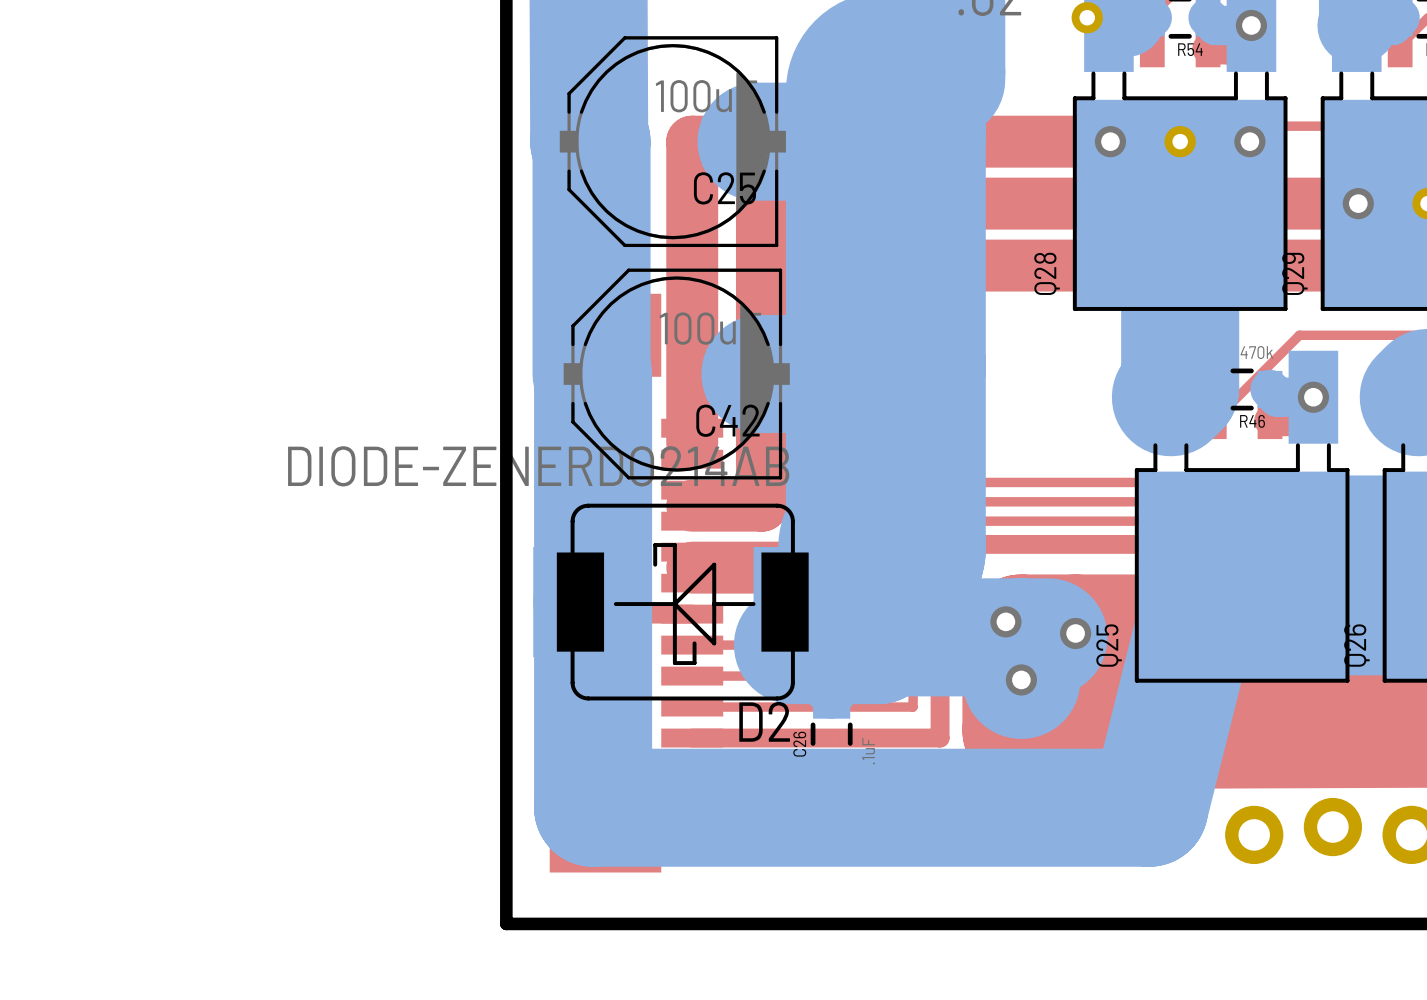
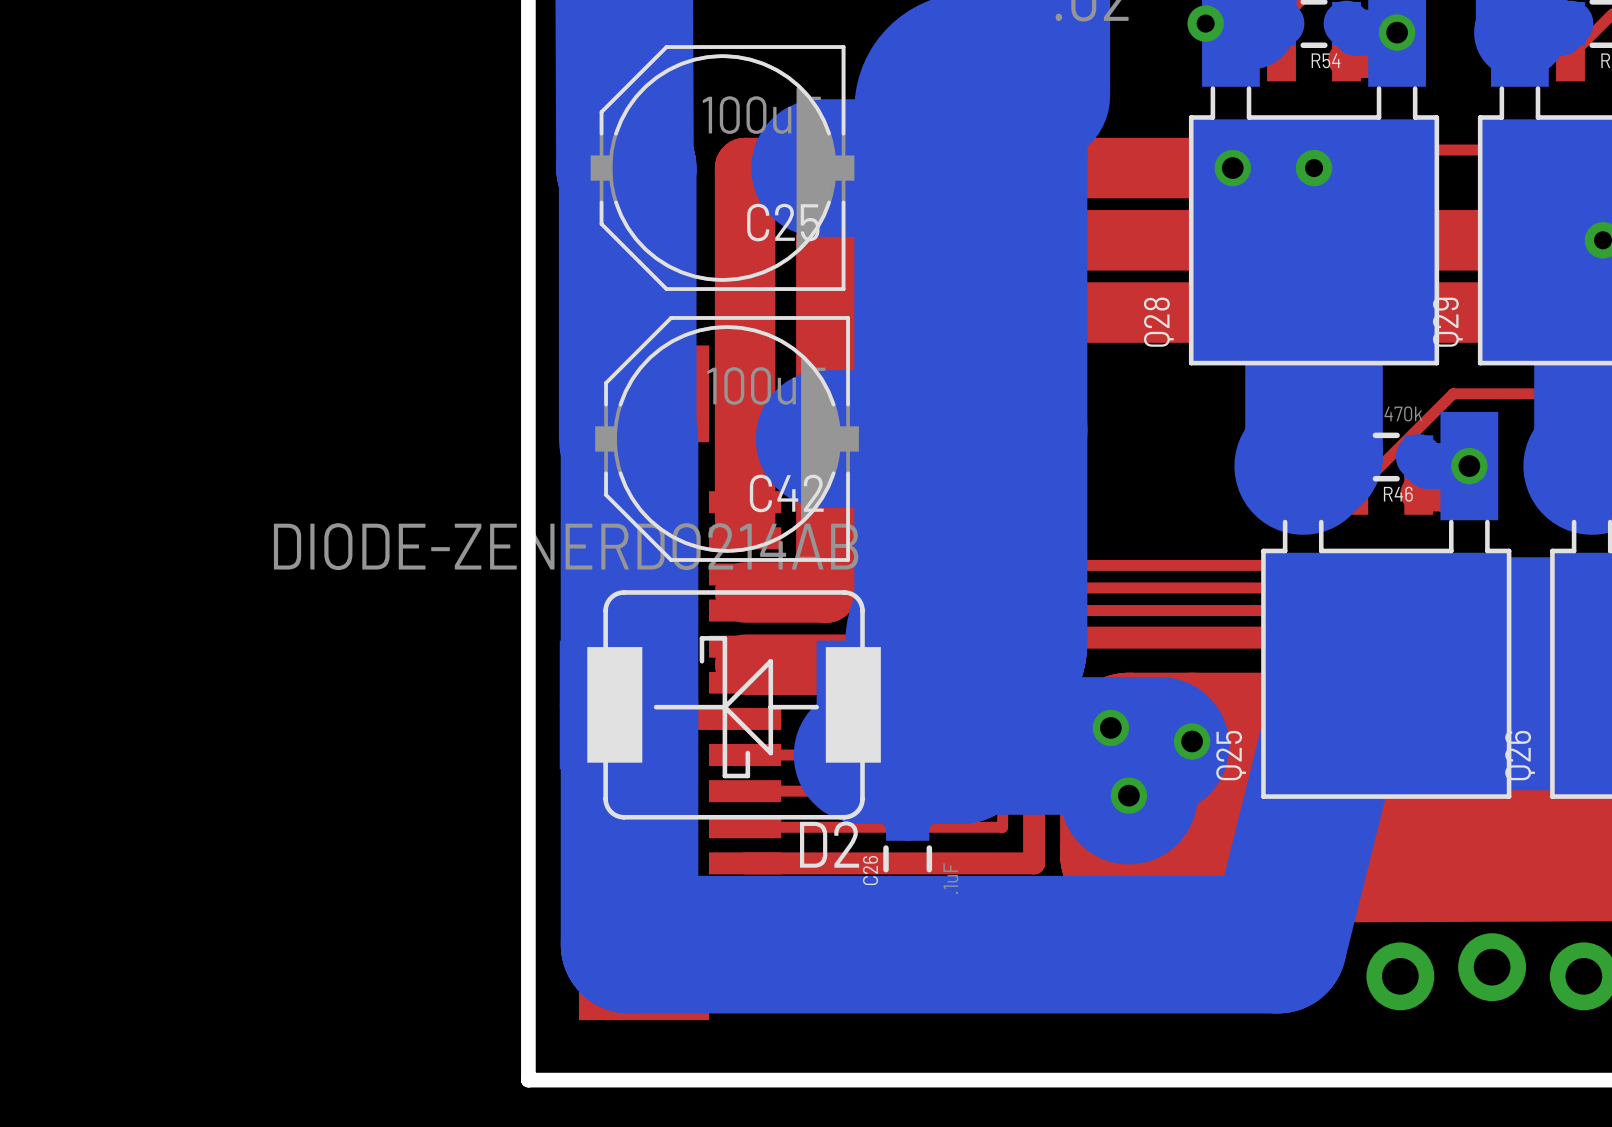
via: (1249, 141) -> none
via: (1358, 203) -> none

